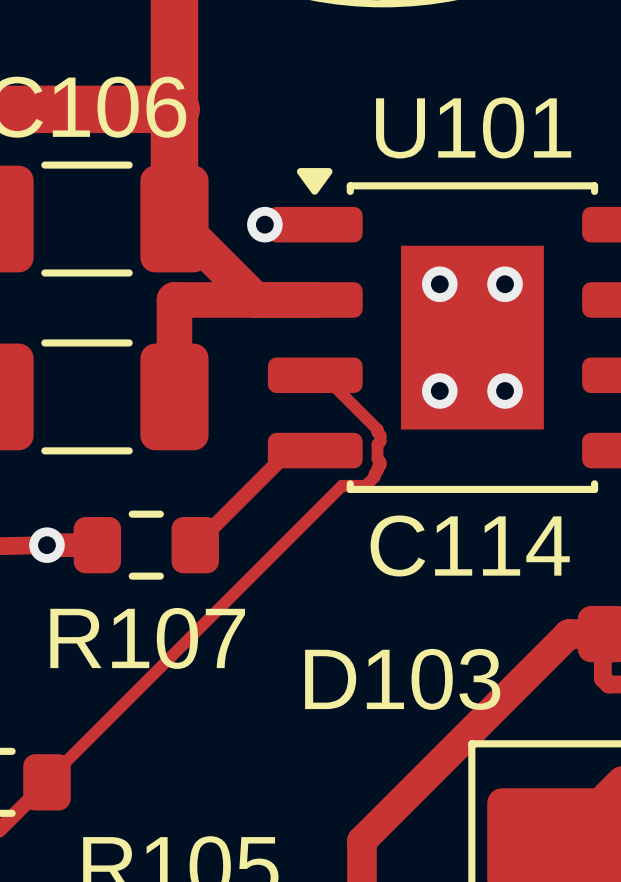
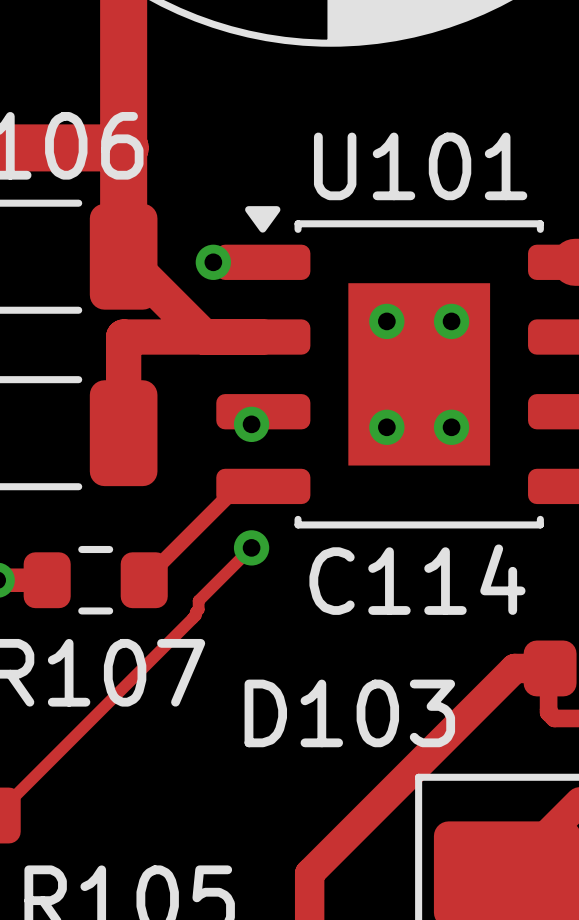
track: (315, 376) (324, 376) (377, 429) (380, 435) (380, 441) (377, 444) (377, 459) (380, 465) (374, 476) (365, 485) (341, 485) (247, 580) -> (251, 547) (198, 600) (198, 609) (195, 615)
via: none -> (251, 424)
via: none -> (251, 547)

